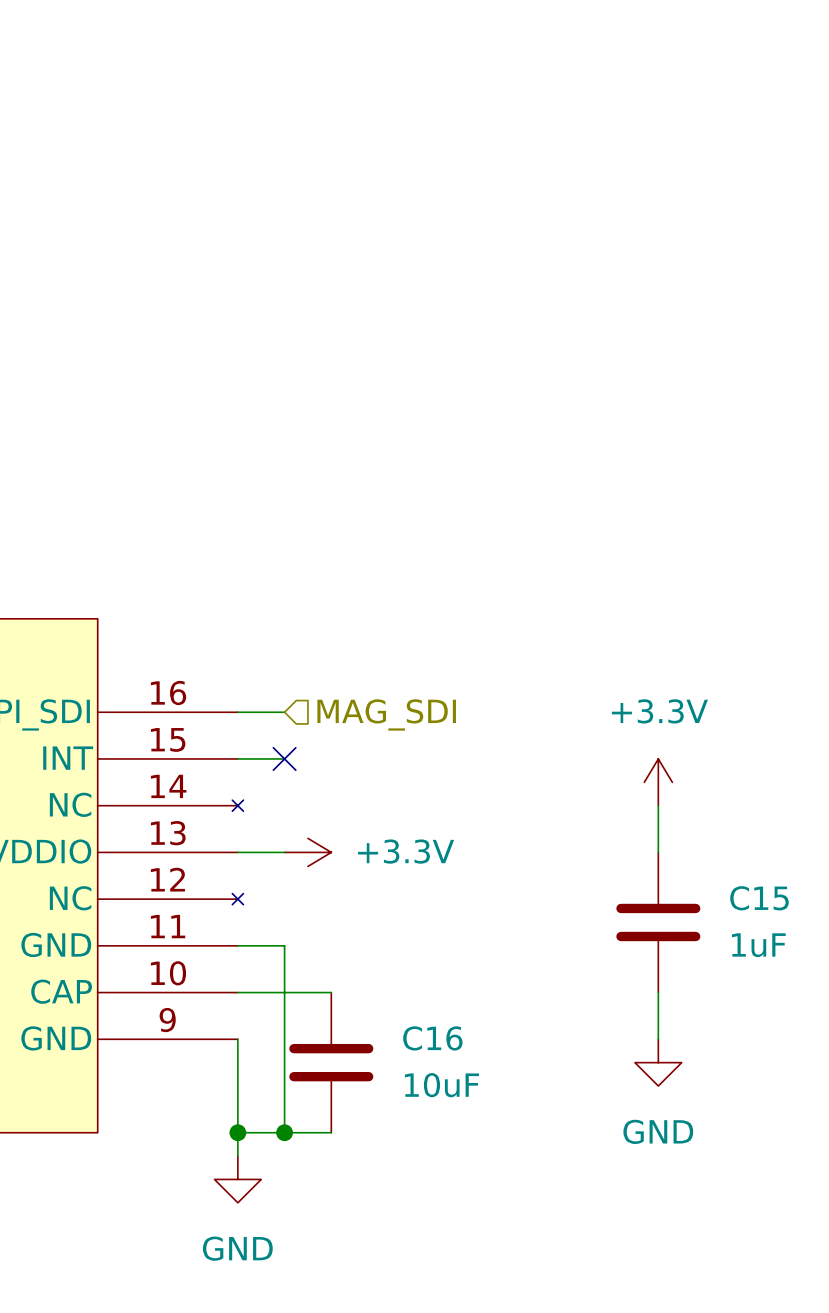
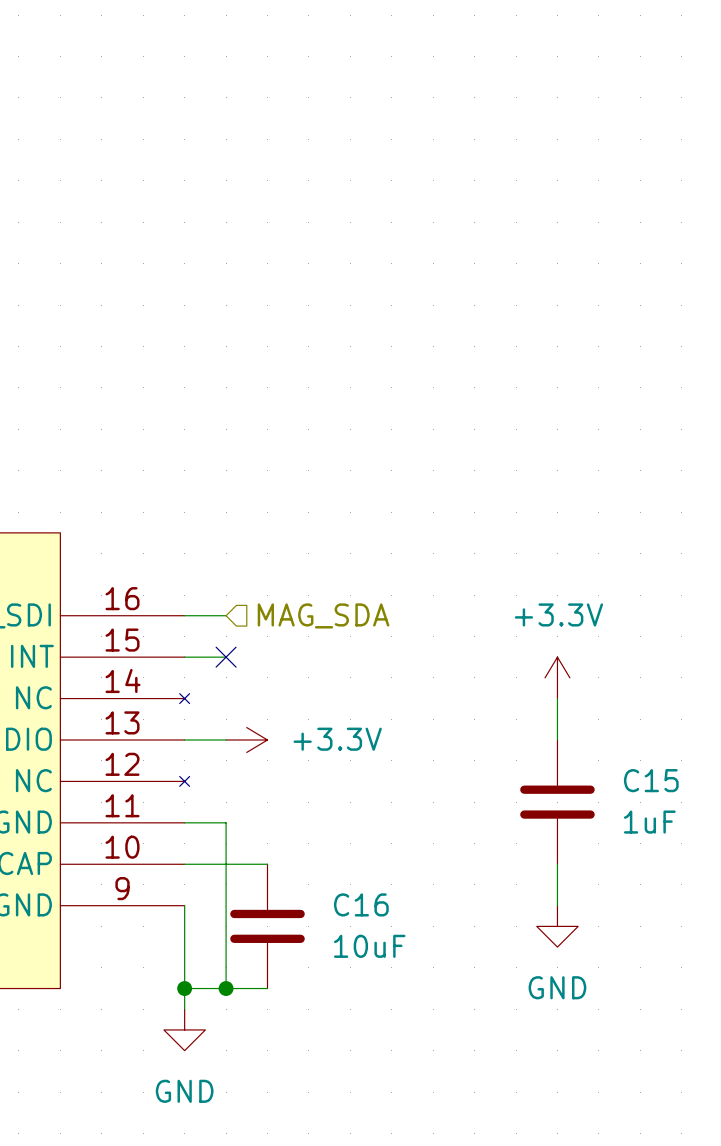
hierarchical label: MAG_SDI (386, 714) -> MAG_SDA (323, 615)

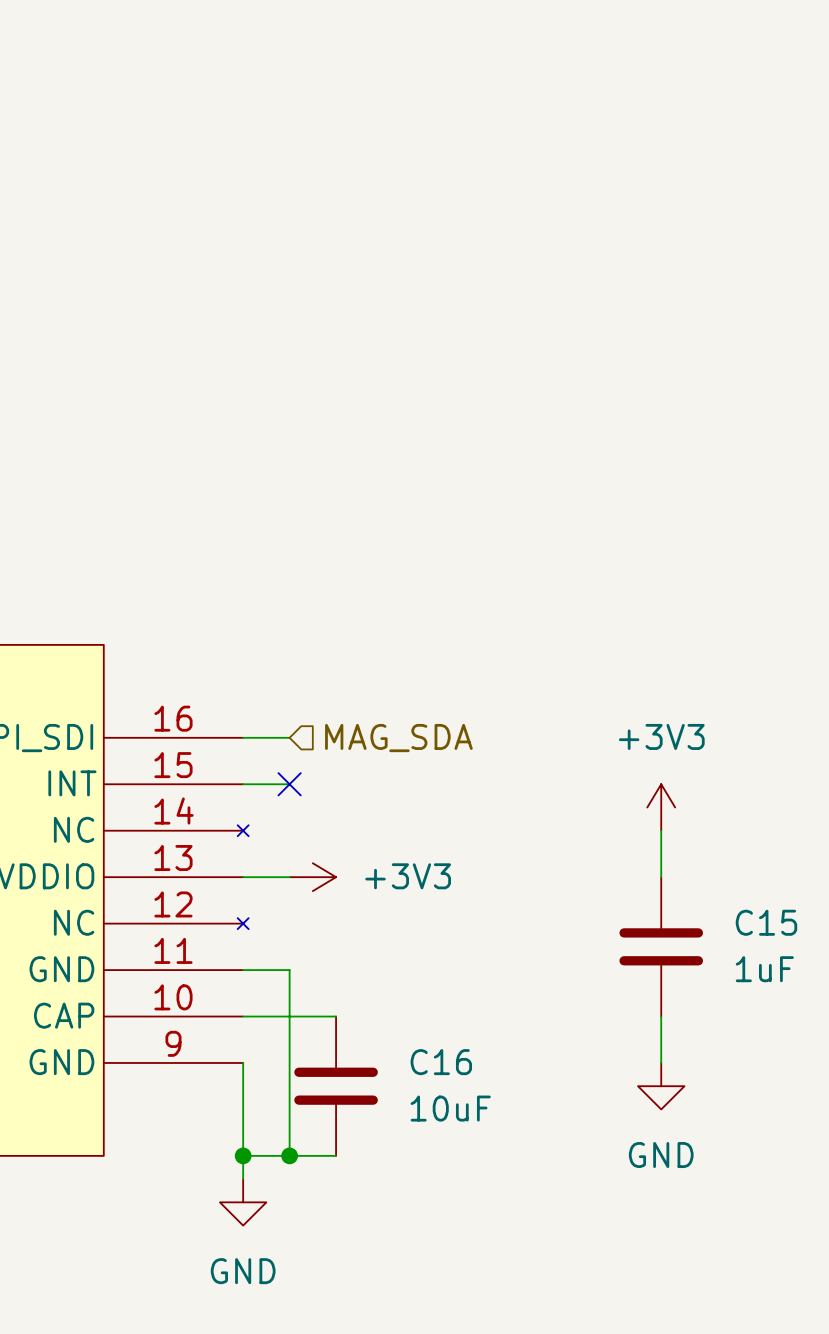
power symbol: +3.3V (557, 677) -> +3V3 (661, 807)
power symbol: +3.3V (246, 739) -> +3V3 (312, 877)

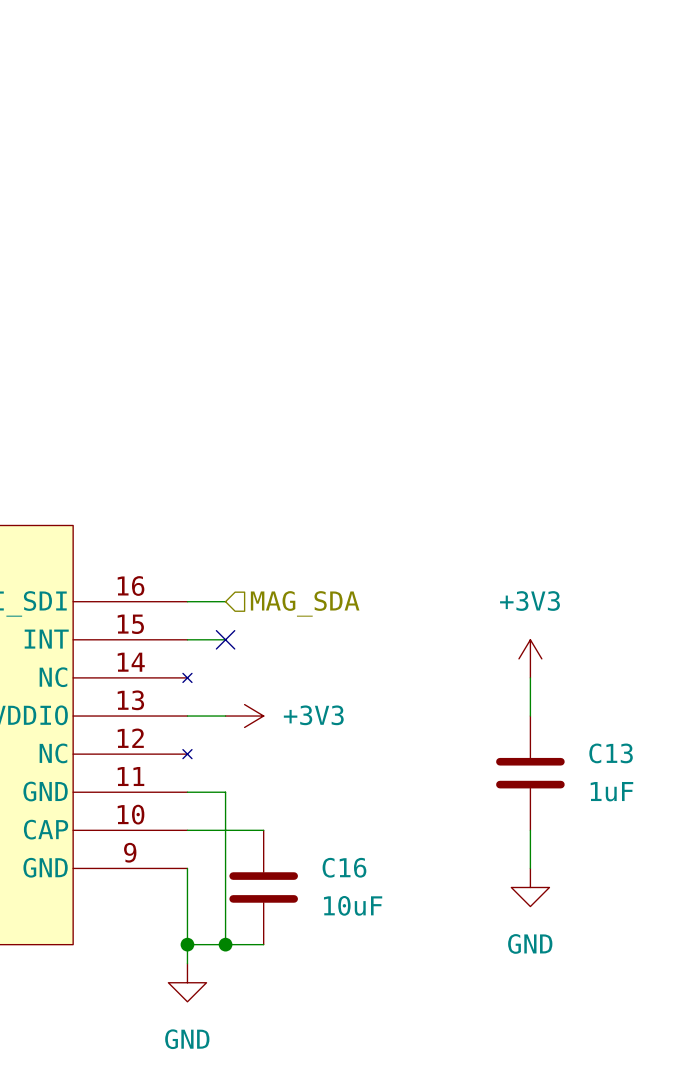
C15 name: C15 (766, 922) -> C13 (611, 753)

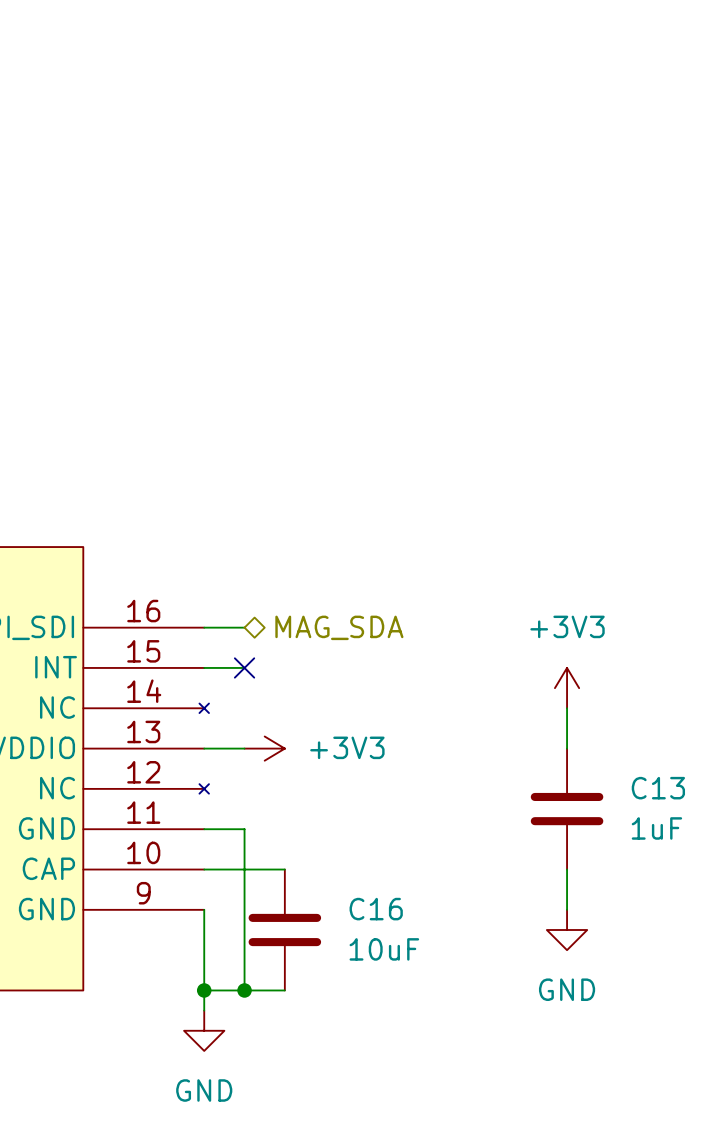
hierarchical label shape: input (305, 603) -> bidirectional (339, 627)

